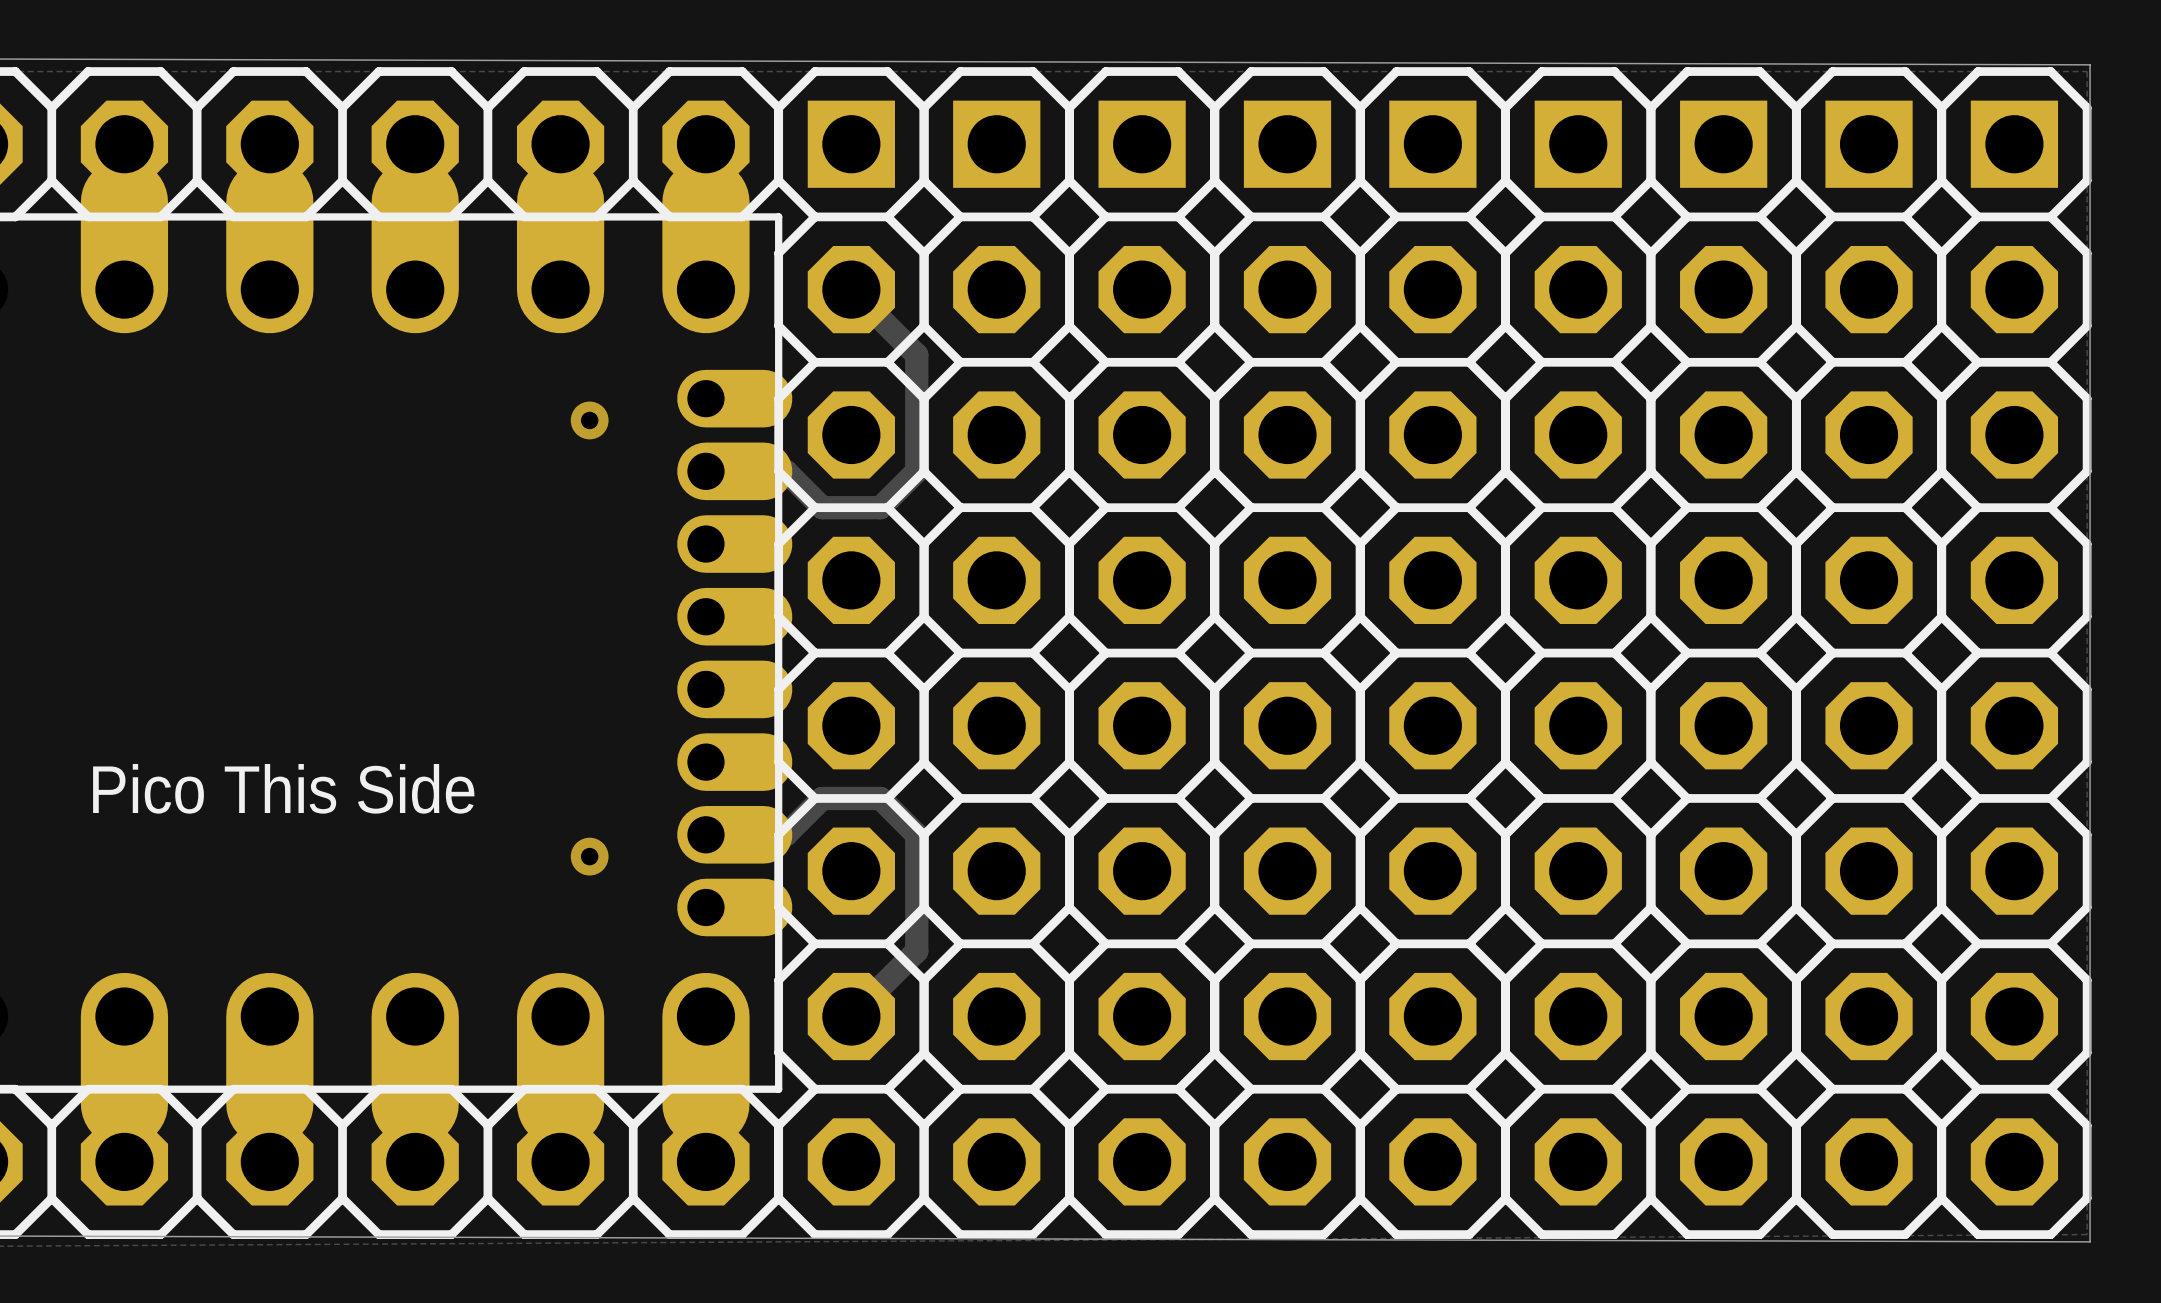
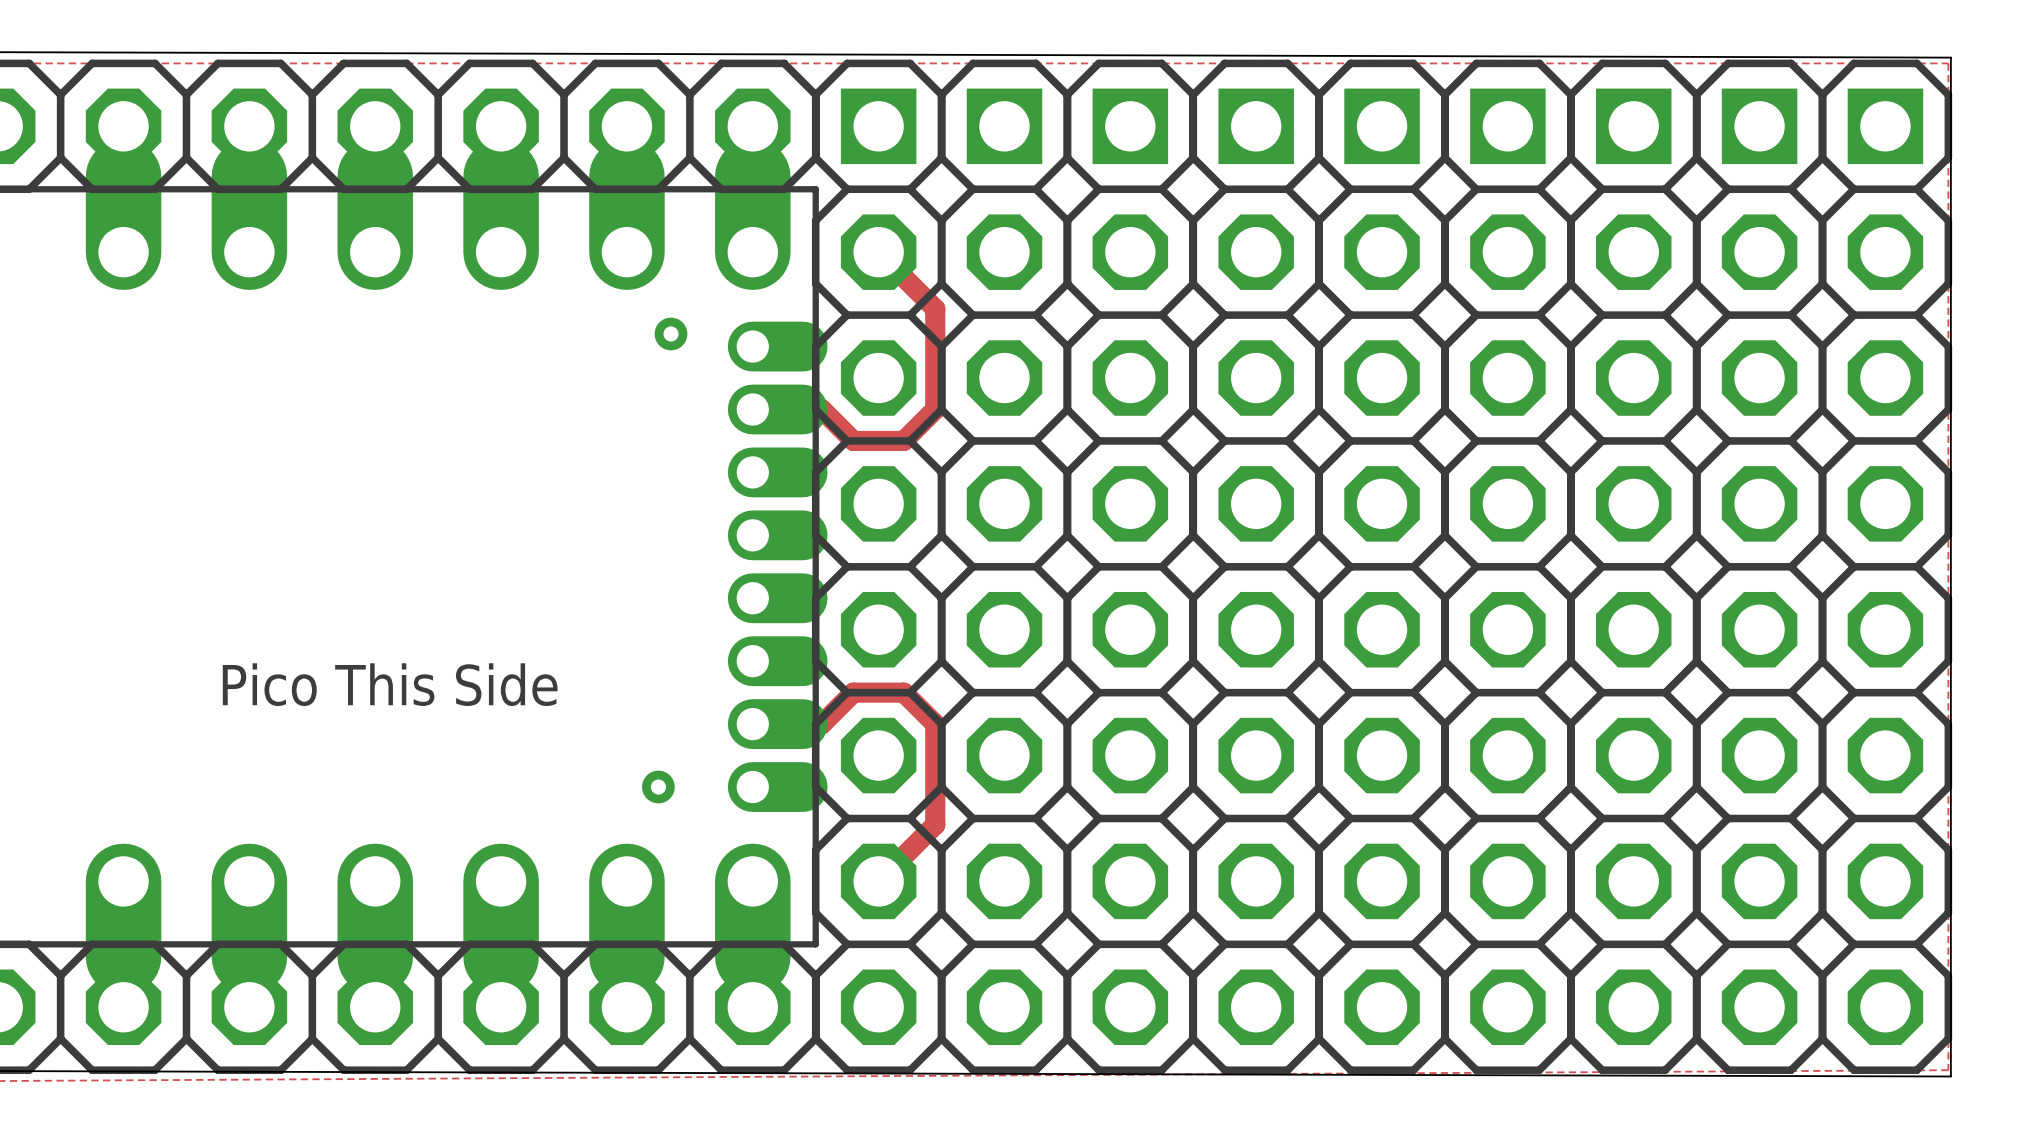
via position: (589, 420) -> (671, 333)
via position: (589, 856) -> (658, 787)

